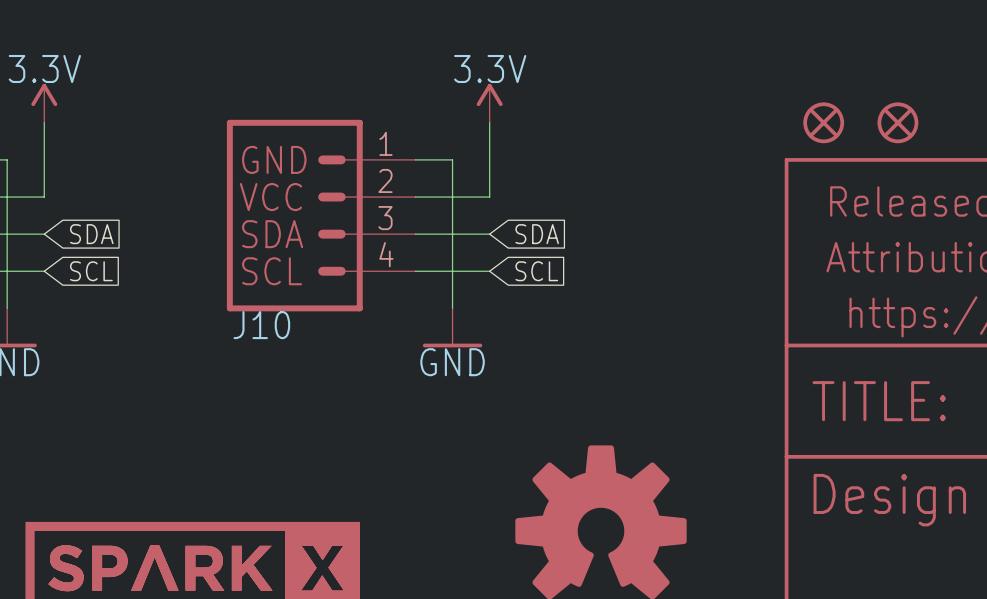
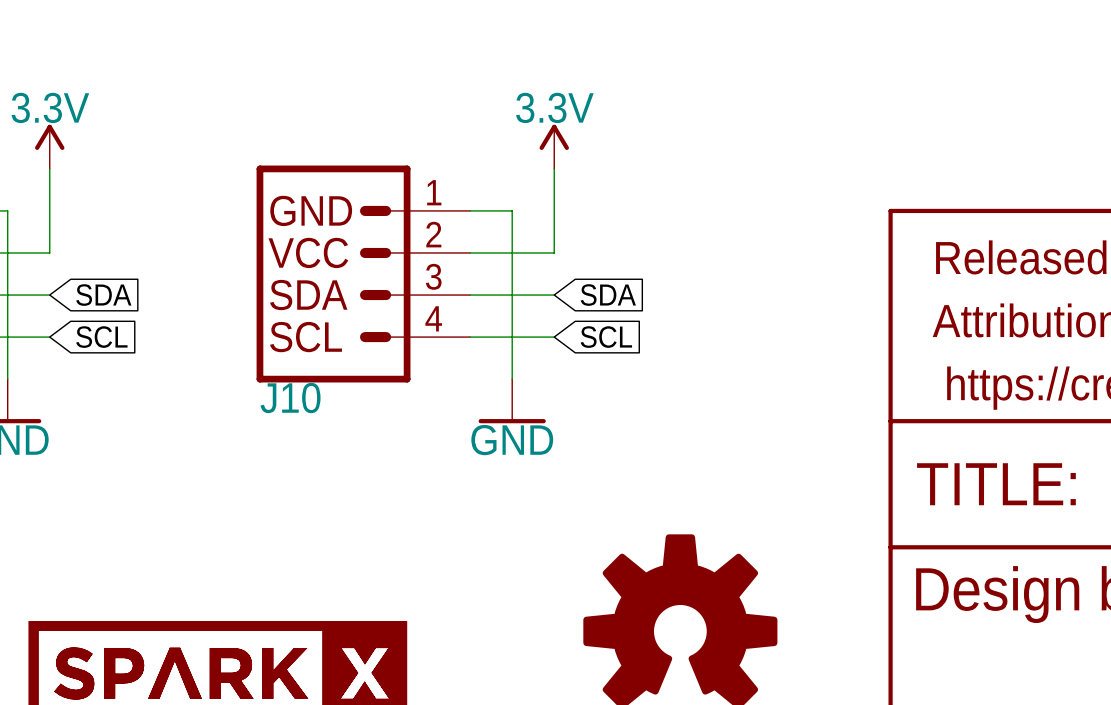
part: (823, 122) -> none
part: (897, 122) -> none

